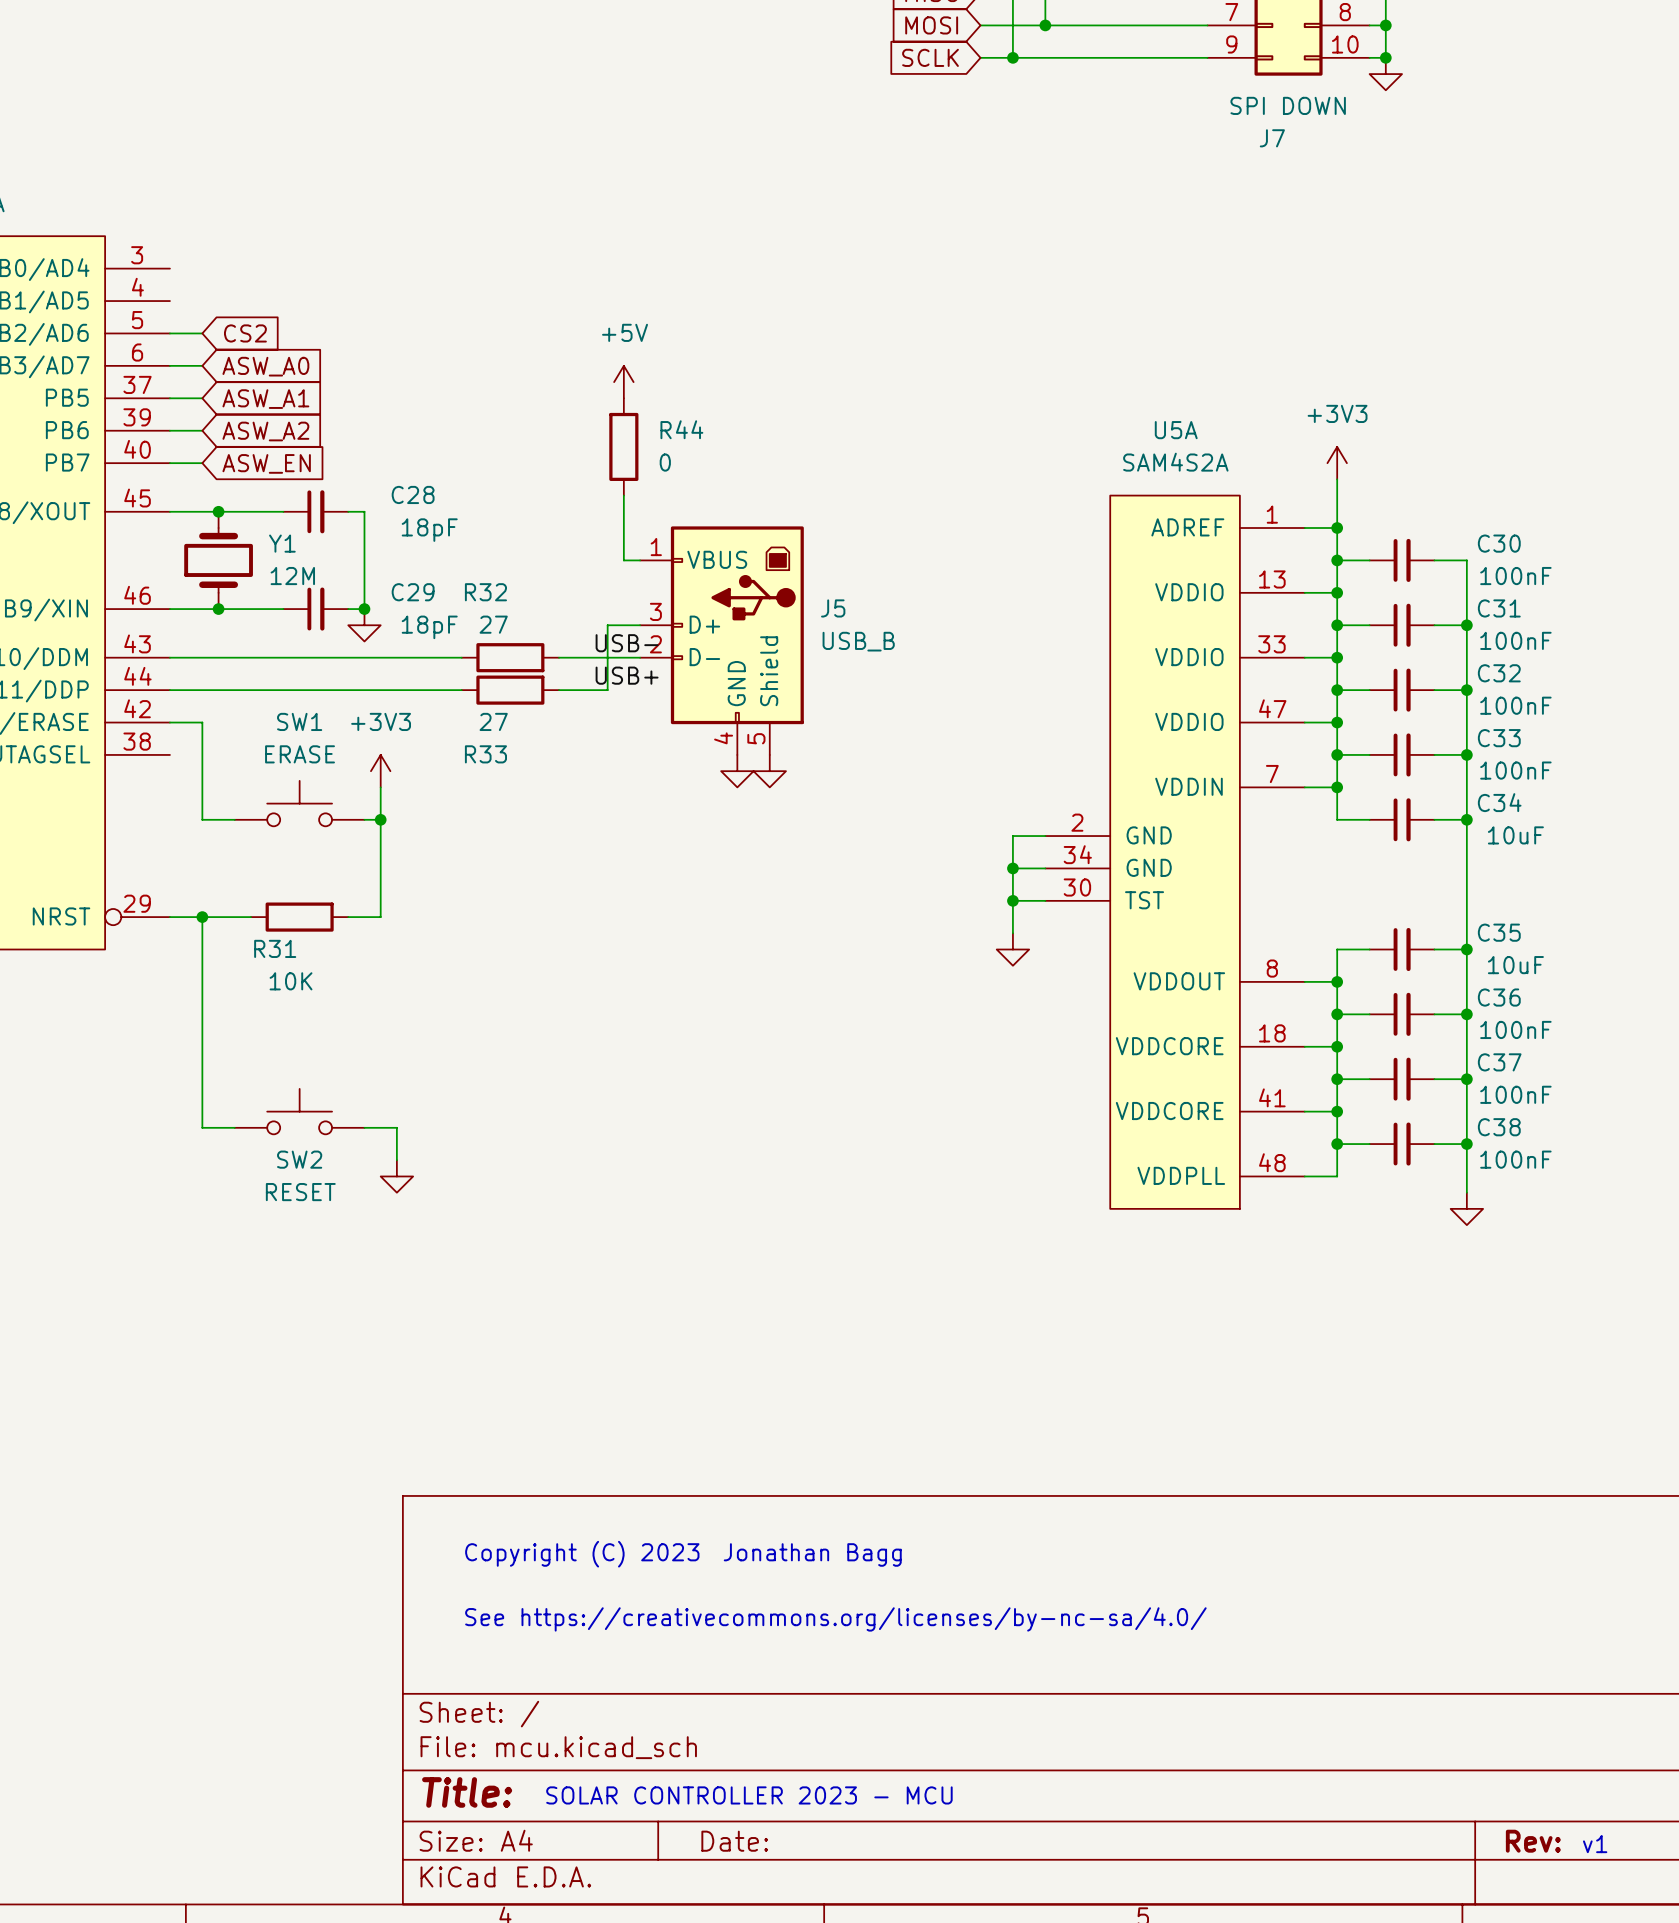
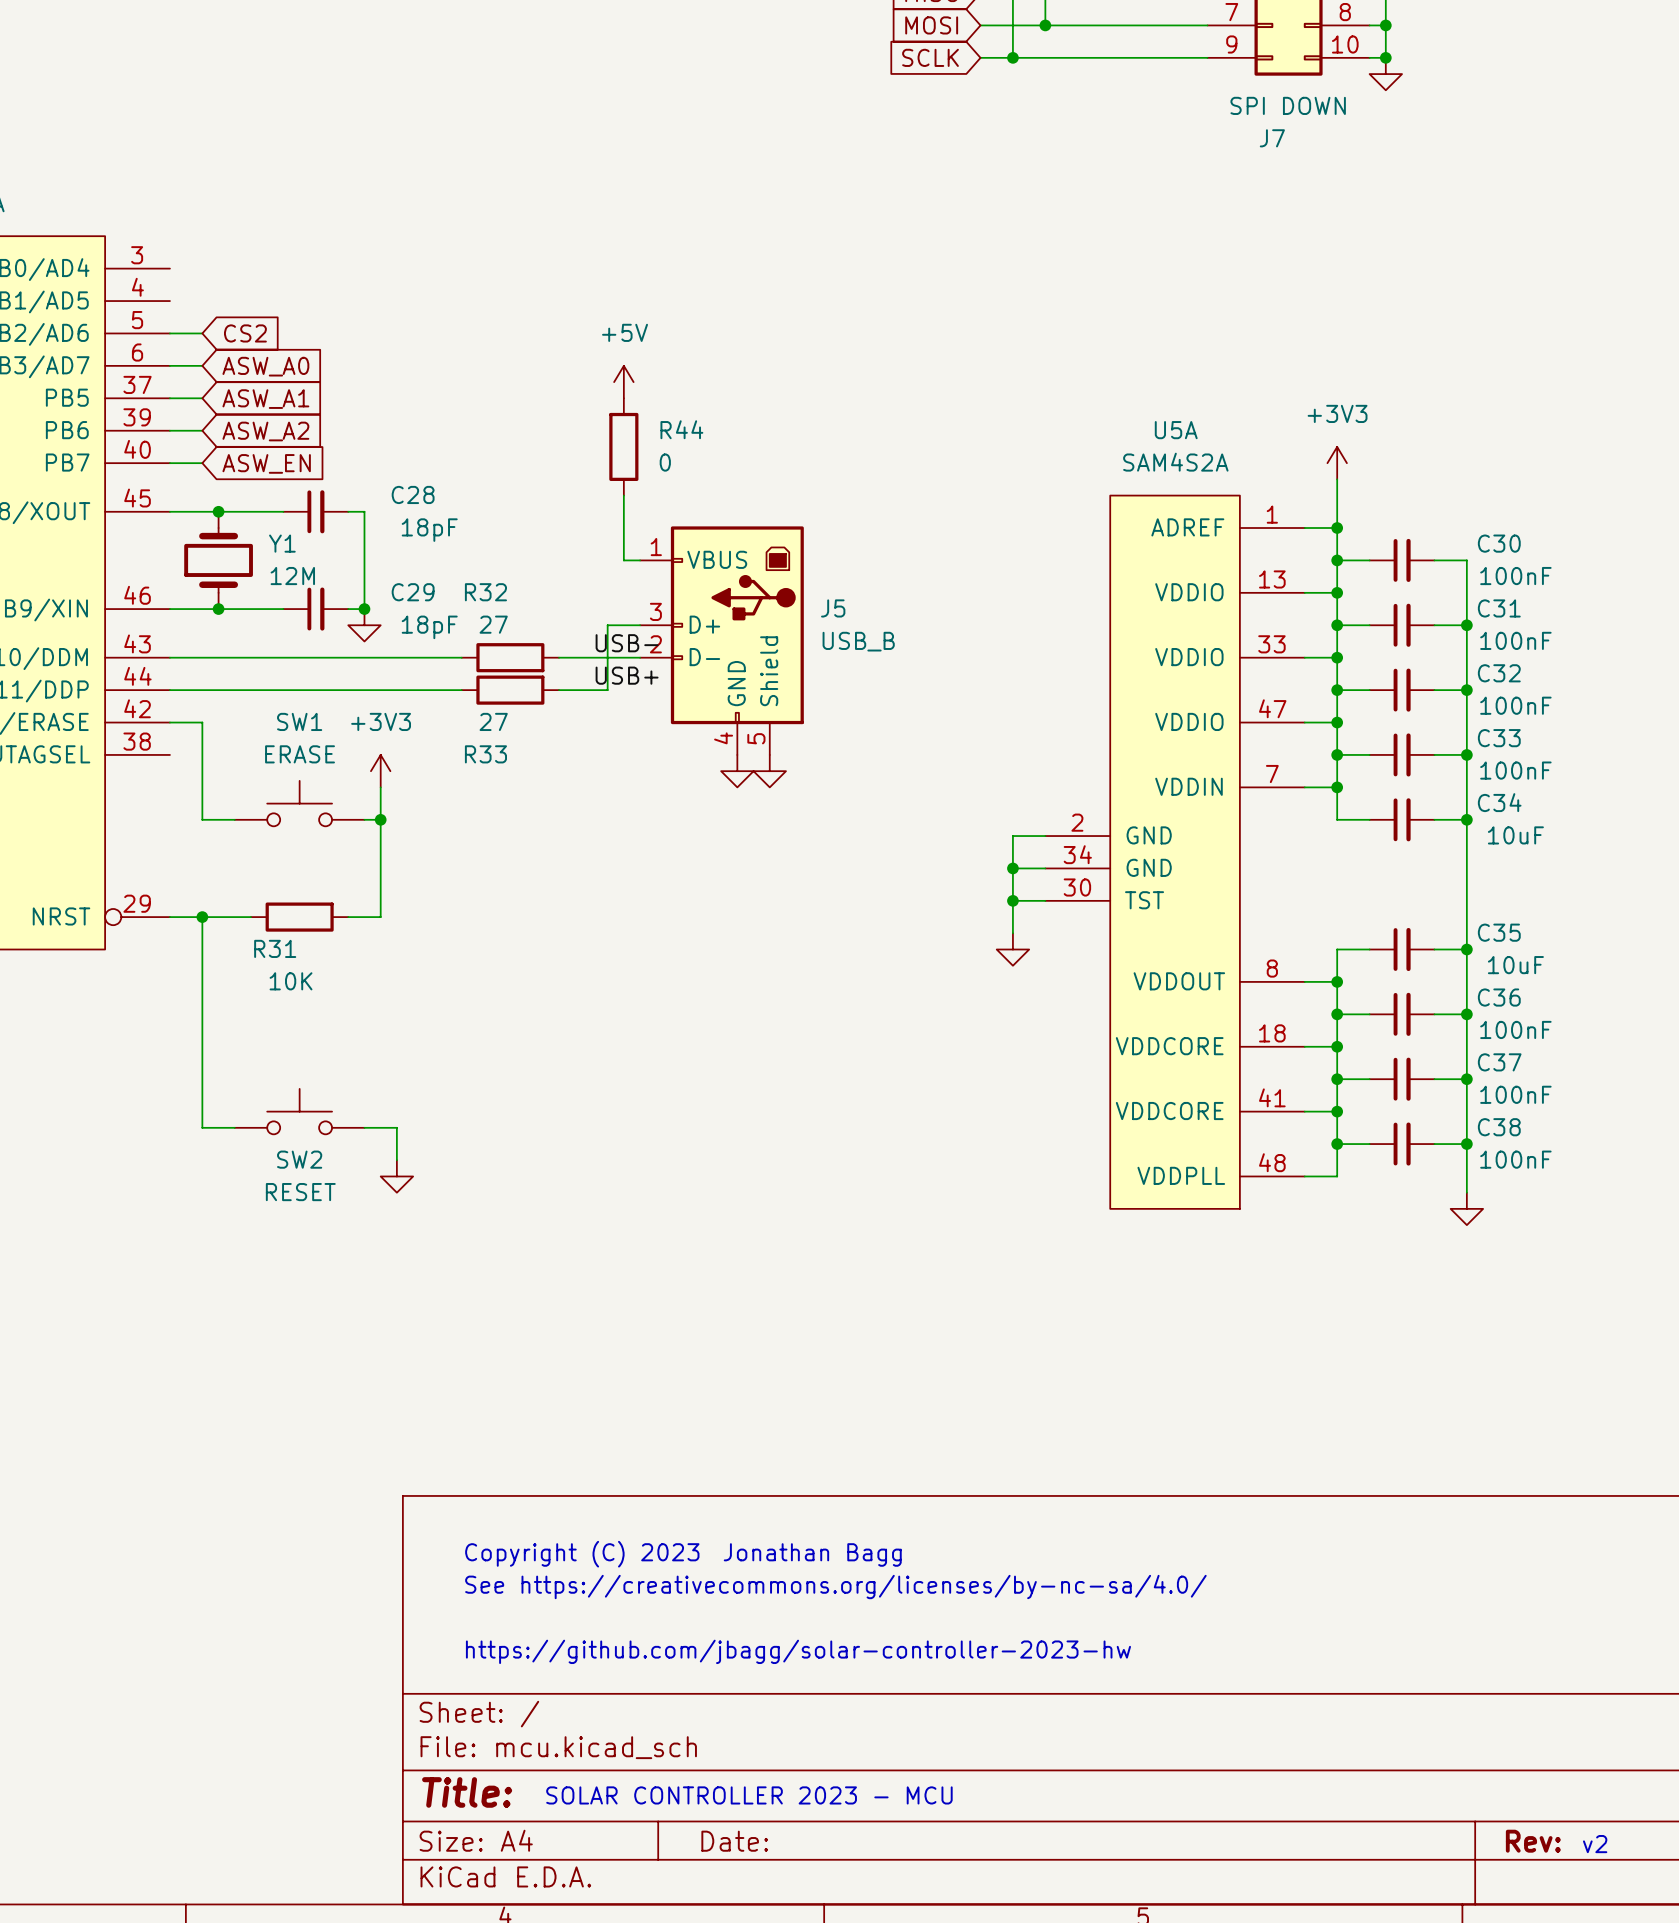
text position: See https://creativecommons.org/licenses/by-nc-sa/4.0/ (835, 1619) -> See https://creativecommons.org/licenses/by-nc-sa/4.0/ (835, 1587)
text: none -> https://github.com/jbagg/solar-controller-2023-hw (798, 1651)
text: v1 (1595, 1844) -> v2 (1595, 1844)

